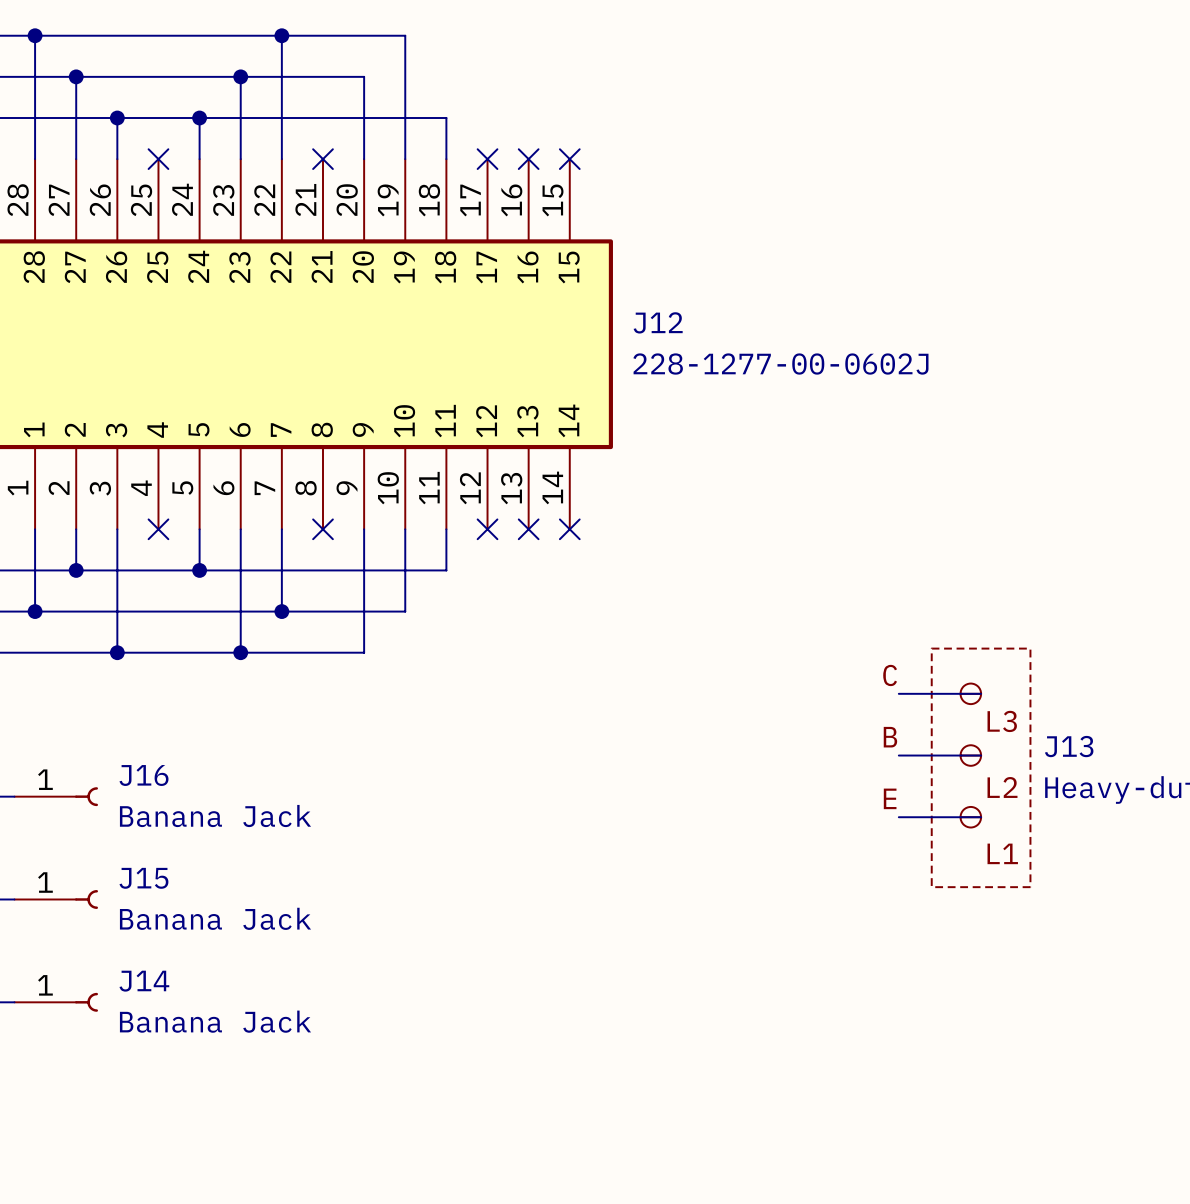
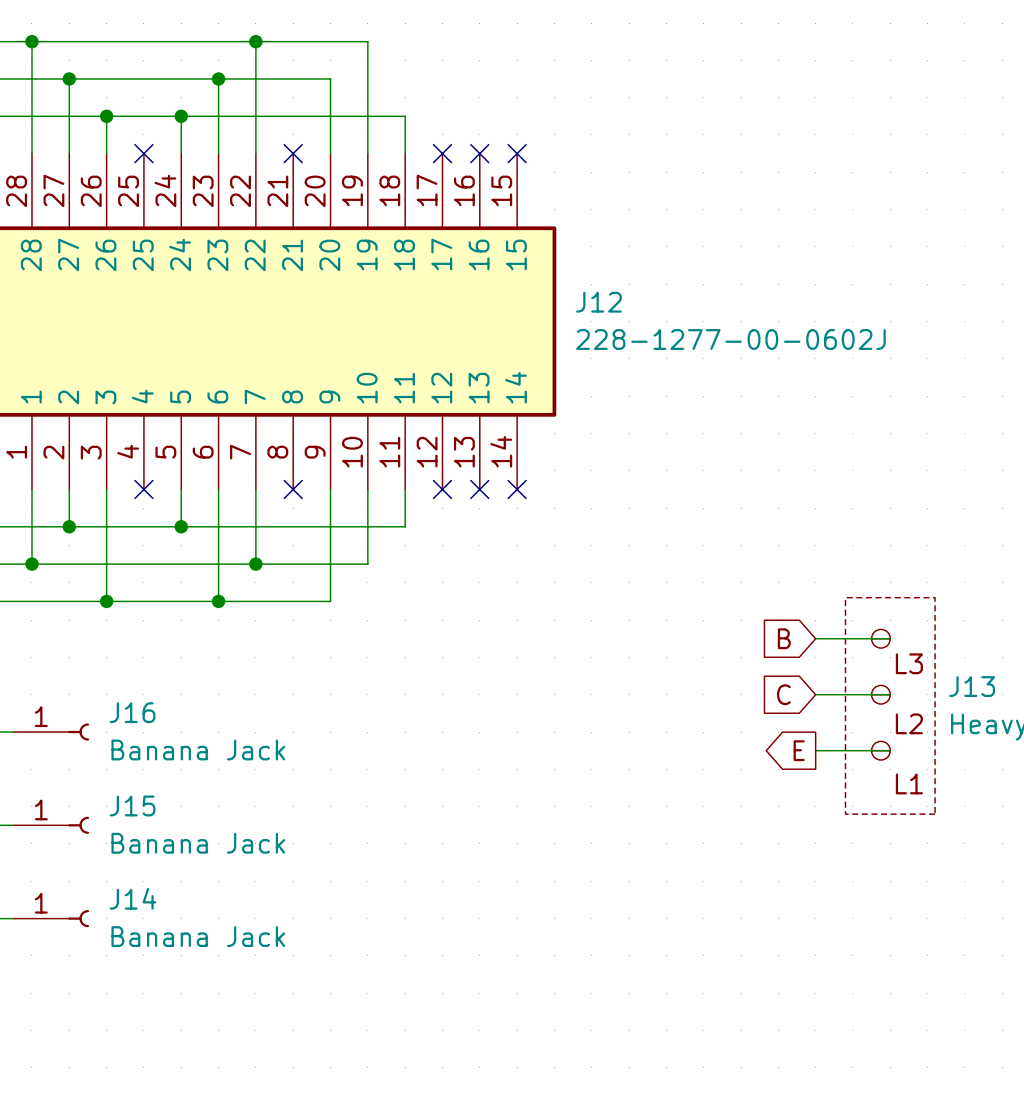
label: C (890, 675) -> none
global label: none -> B (784, 638)
label: B (890, 737) -> none
global label: none -> C (783, 694)
label: E (890, 798) -> none
global label: none -> E (799, 750)

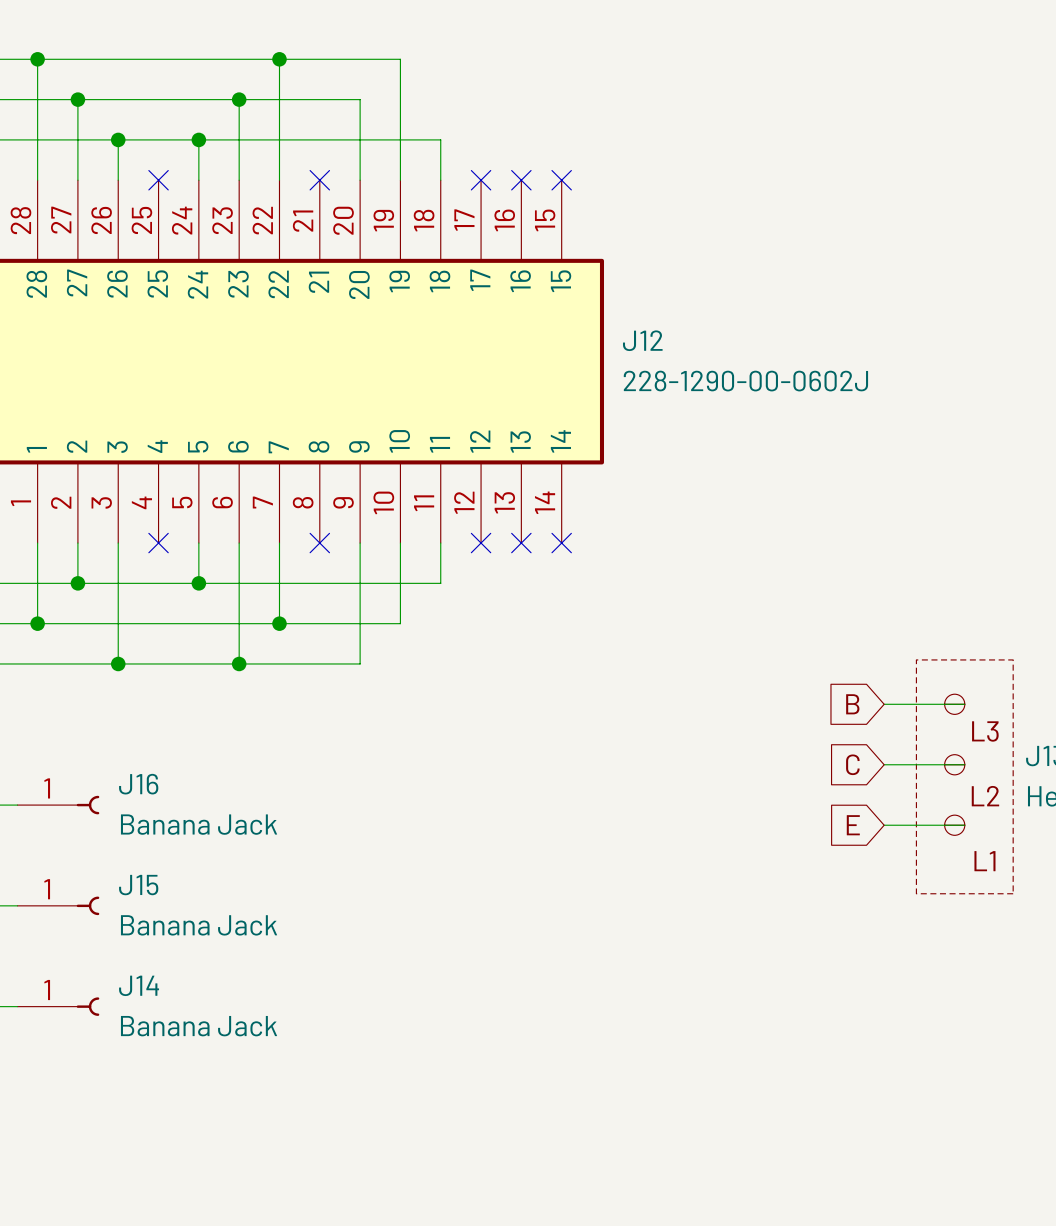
J12 value: 228-1277-00-0602J (730, 339) -> 228-1290-00-0602J (745, 381)
global label shape: output (799, 750) -> input (853, 825)

